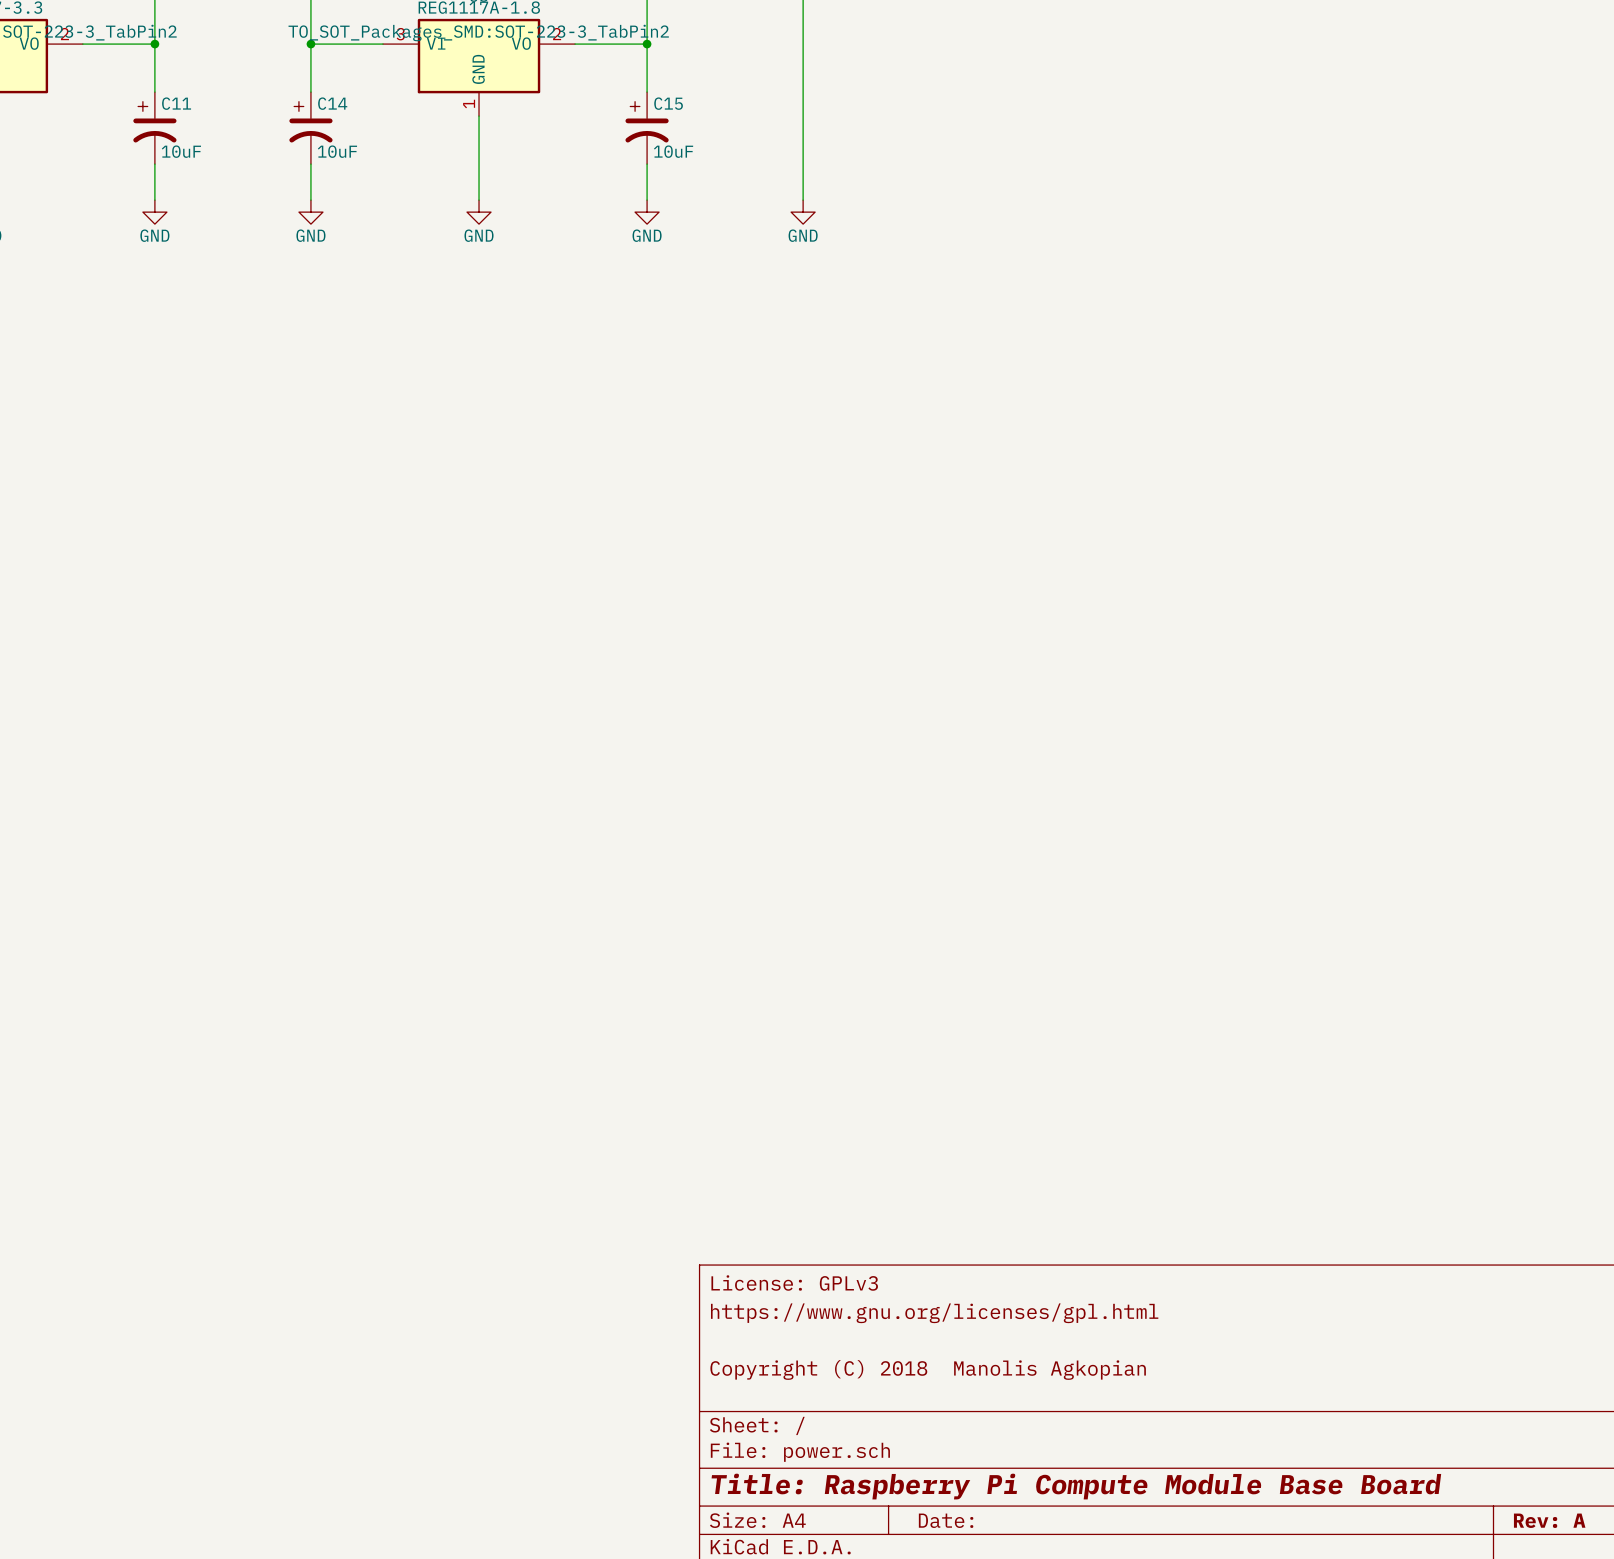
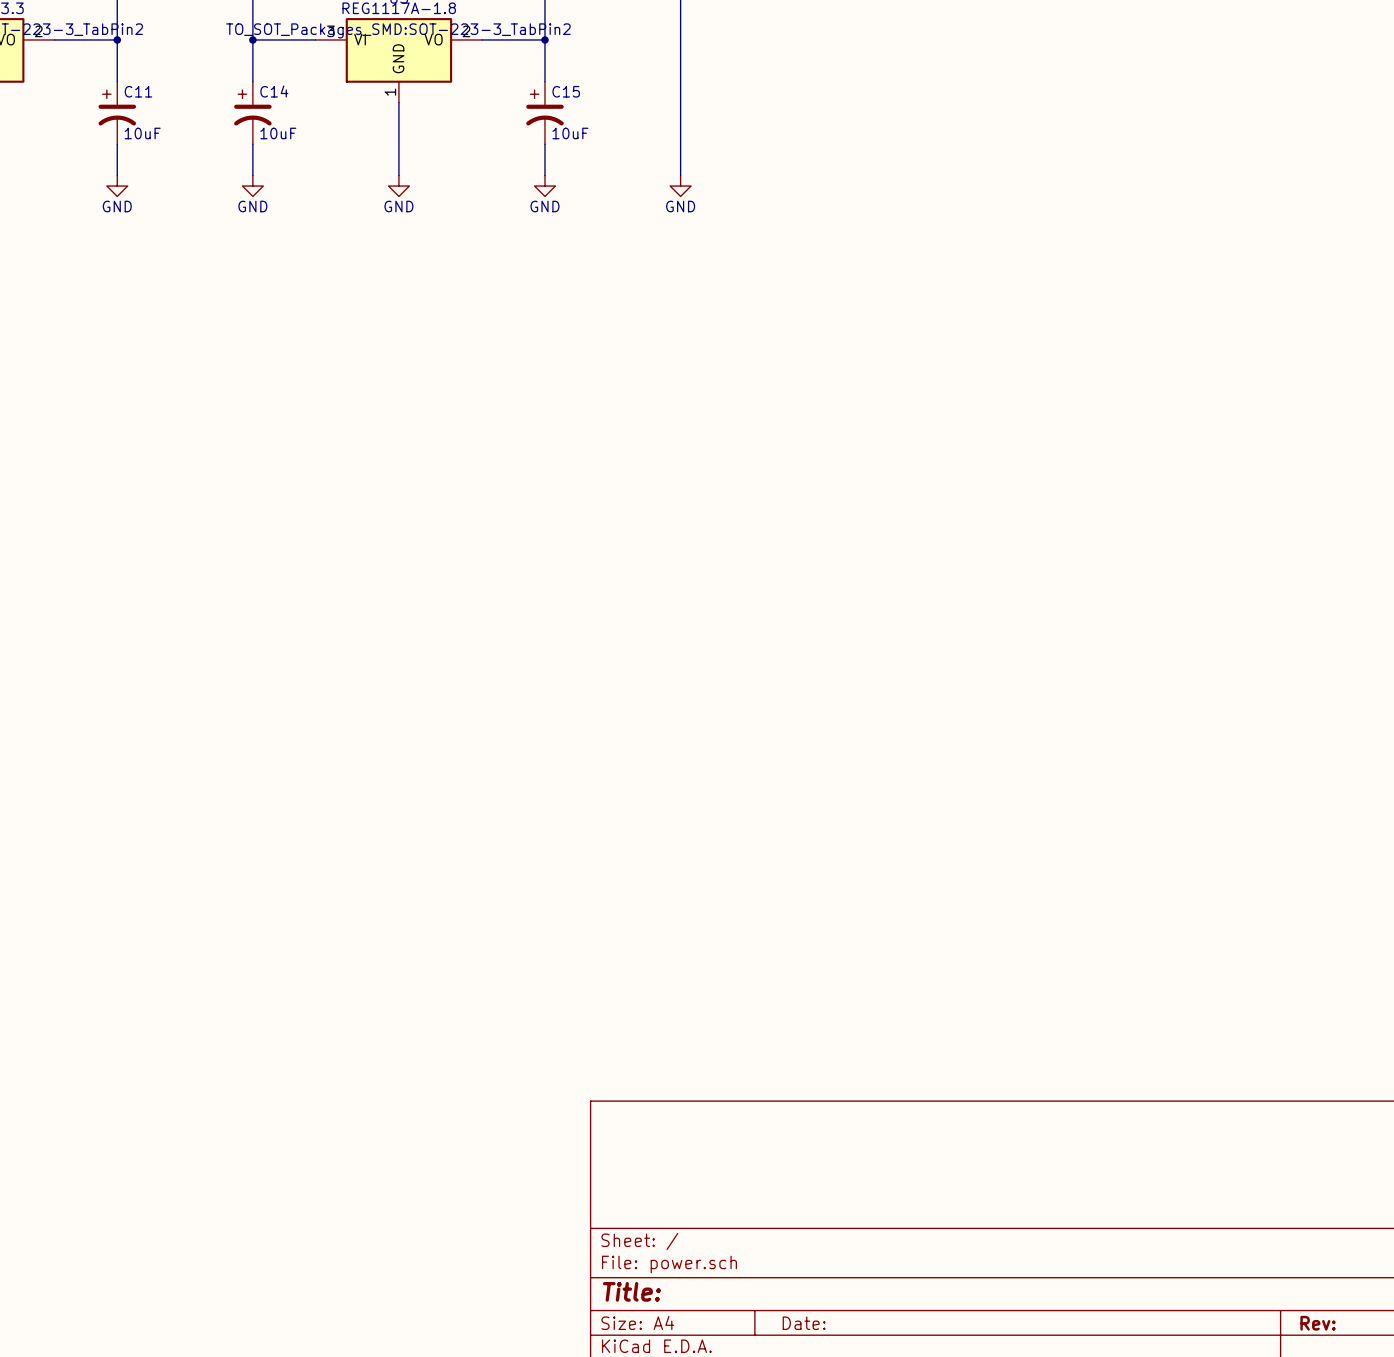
title block: License: GPLv3 (794, 1283) -> none
title block: https://www.gnu.org/licenses/gpl.html (934, 1313) -> none
title block: Copyright (C) 2018 Manolis Agkopian (928, 1369) -> none
title block: Title: Raspberry Pi Compute Module Base Board (1076, 1486) -> Title: (631, 1291)
title block: Rev: A (1549, 1520) -> Rev: (1318, 1323)

